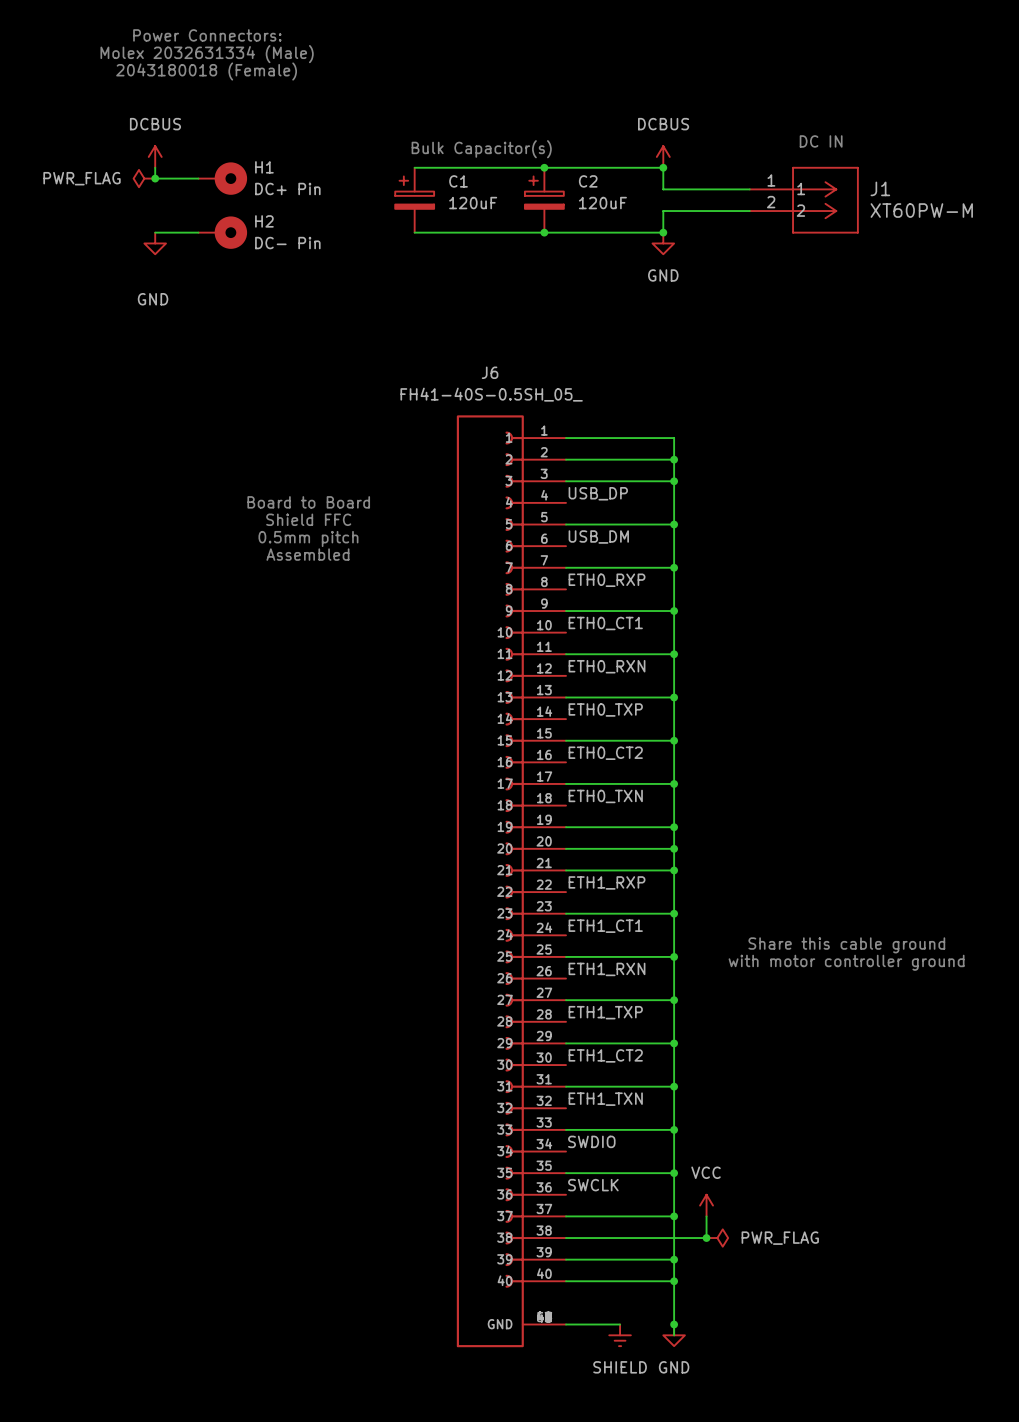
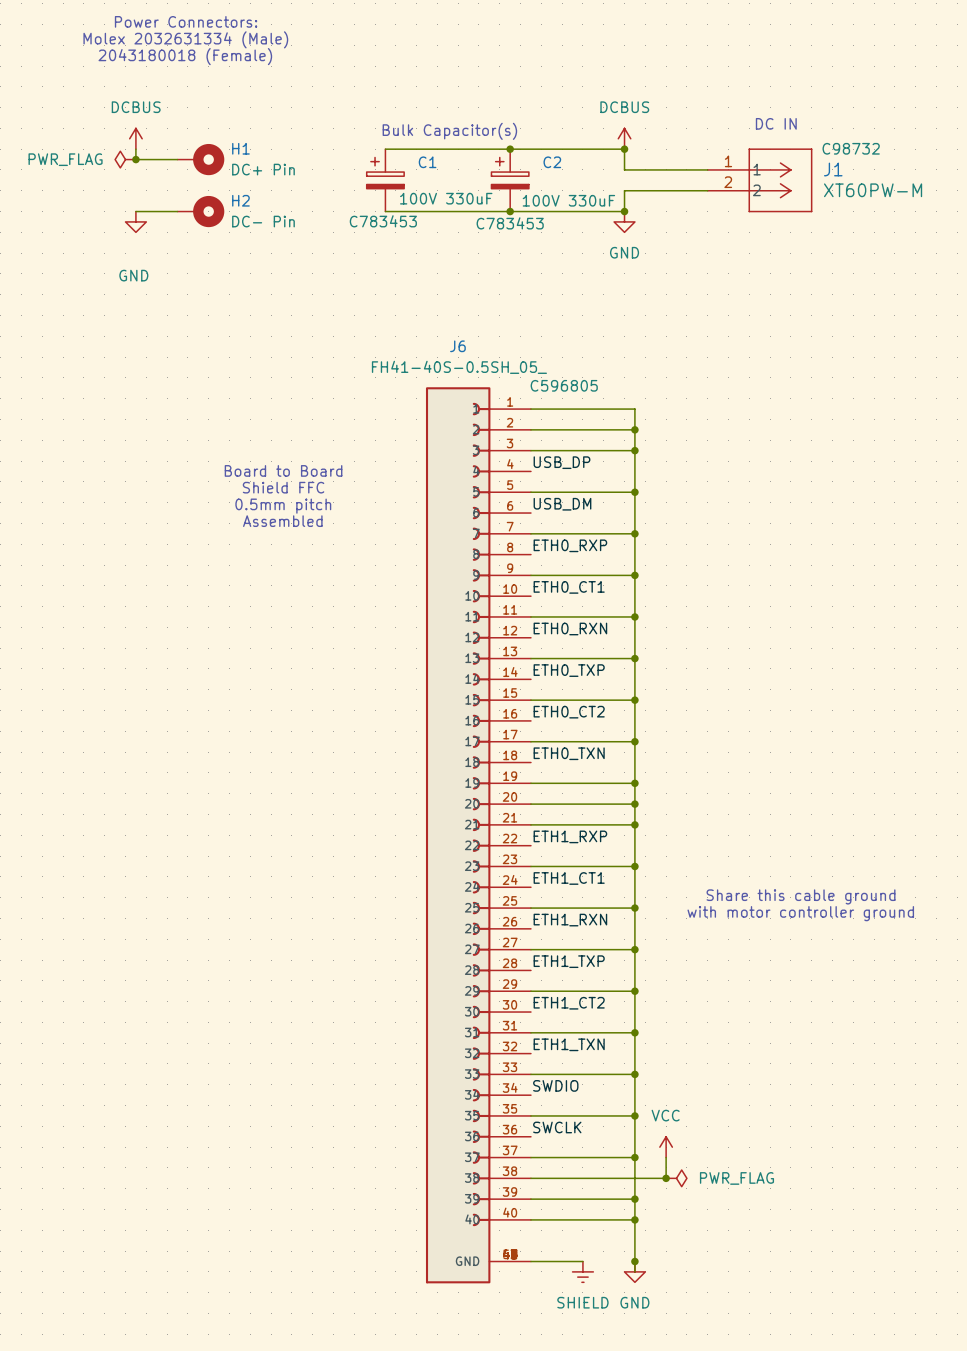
J1 text: none -> C98732 (851, 148)
C1 value: 120uF (473, 203) -> 100V 330uF (446, 198)
C2 value: 120uF (602, 203) -> 100V 330uF (568, 200)
C1 text: none -> C783453 (383, 221)
C2 text: none -> C783453 (510, 223)
J6 text: none -> C596805 (564, 385)

